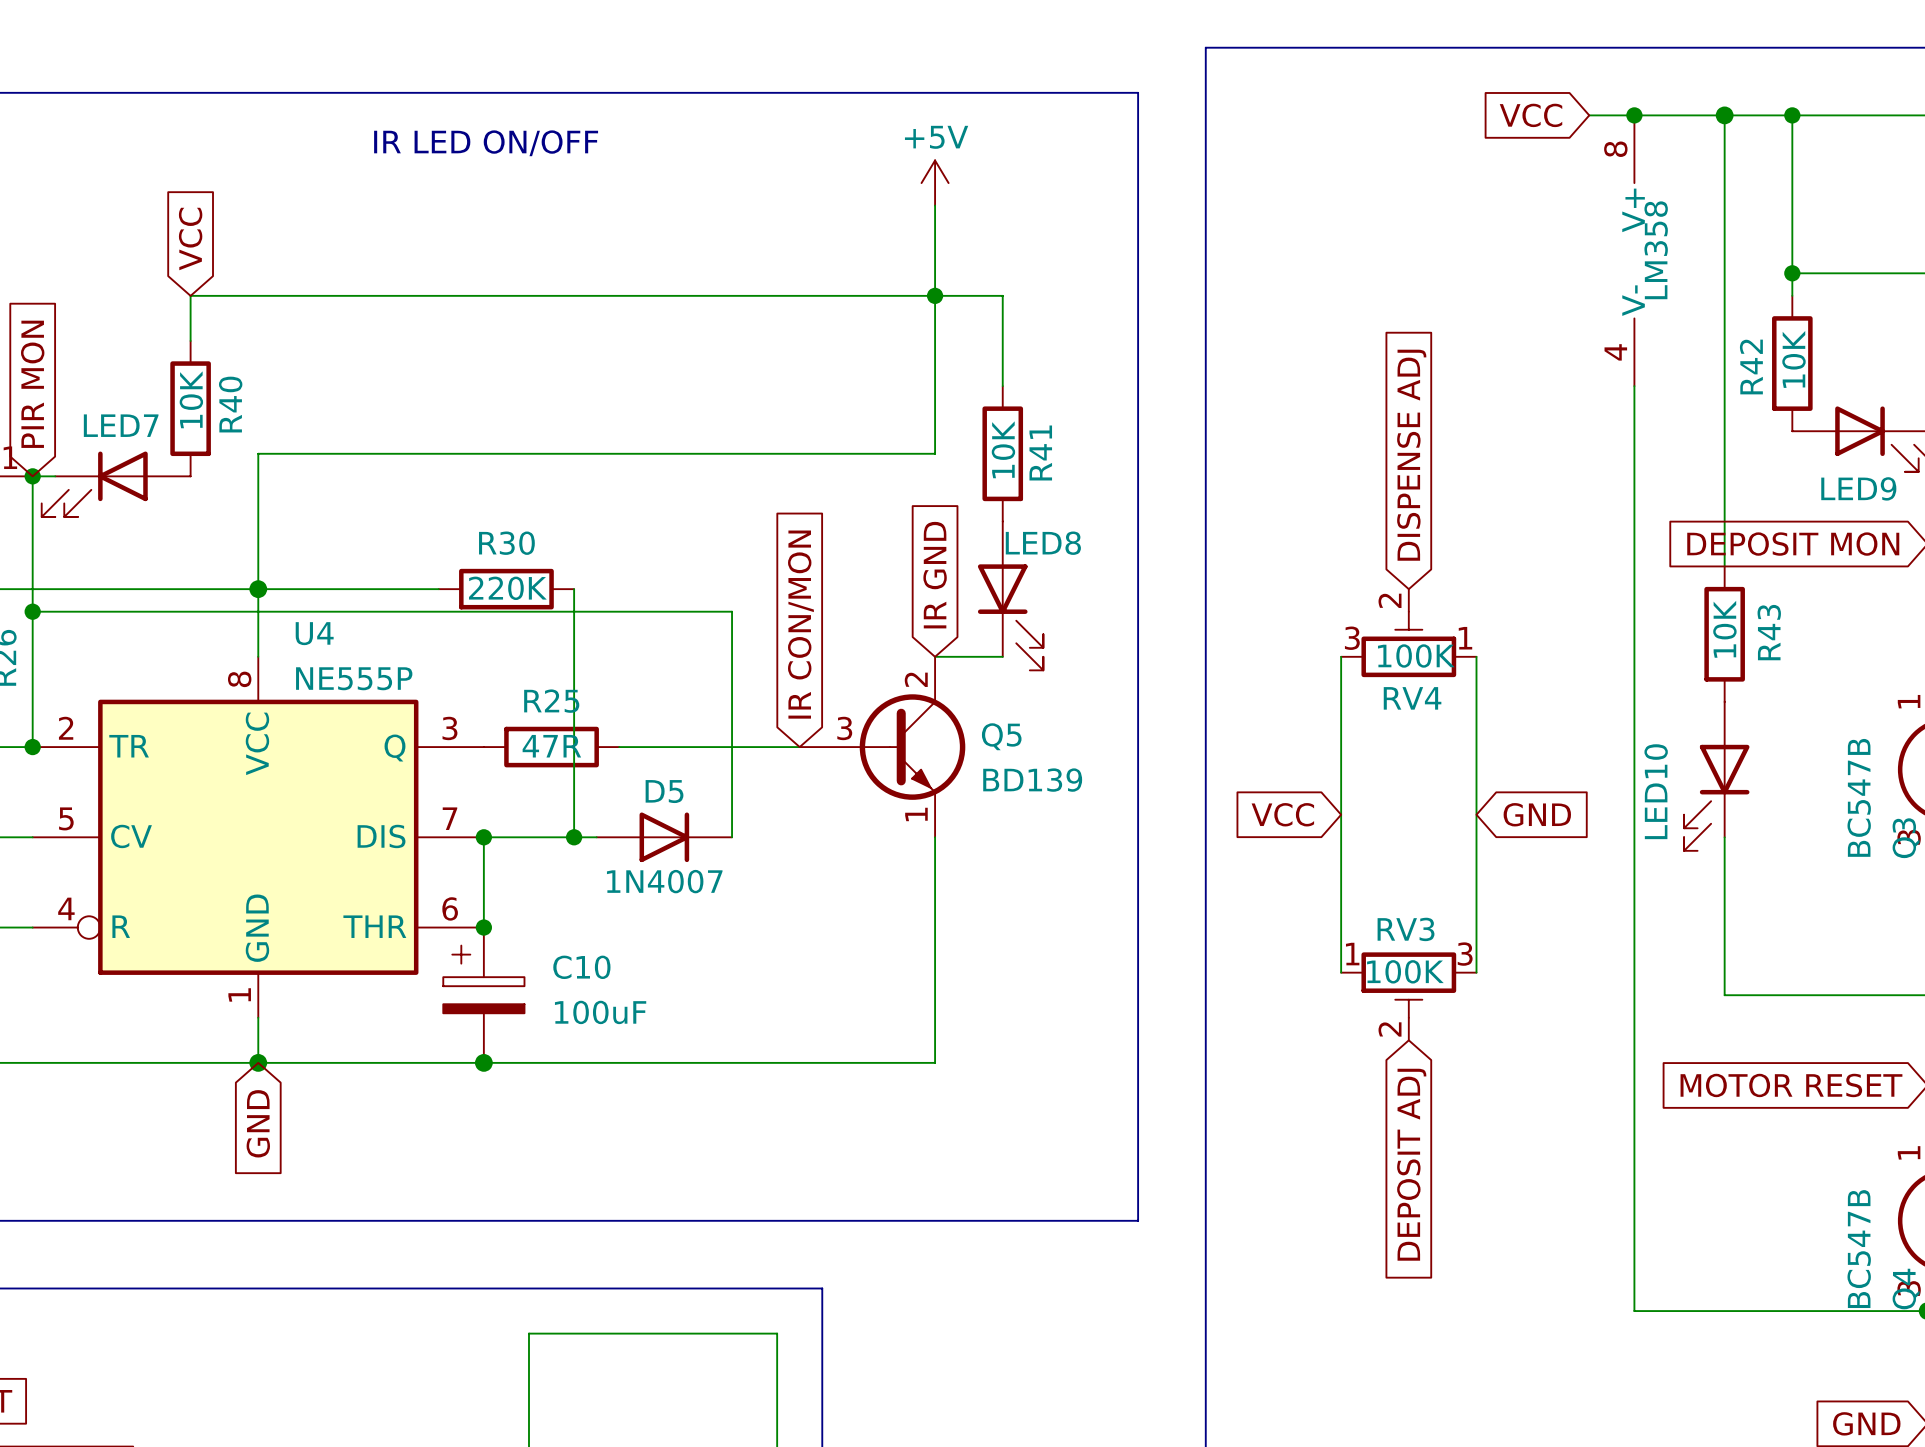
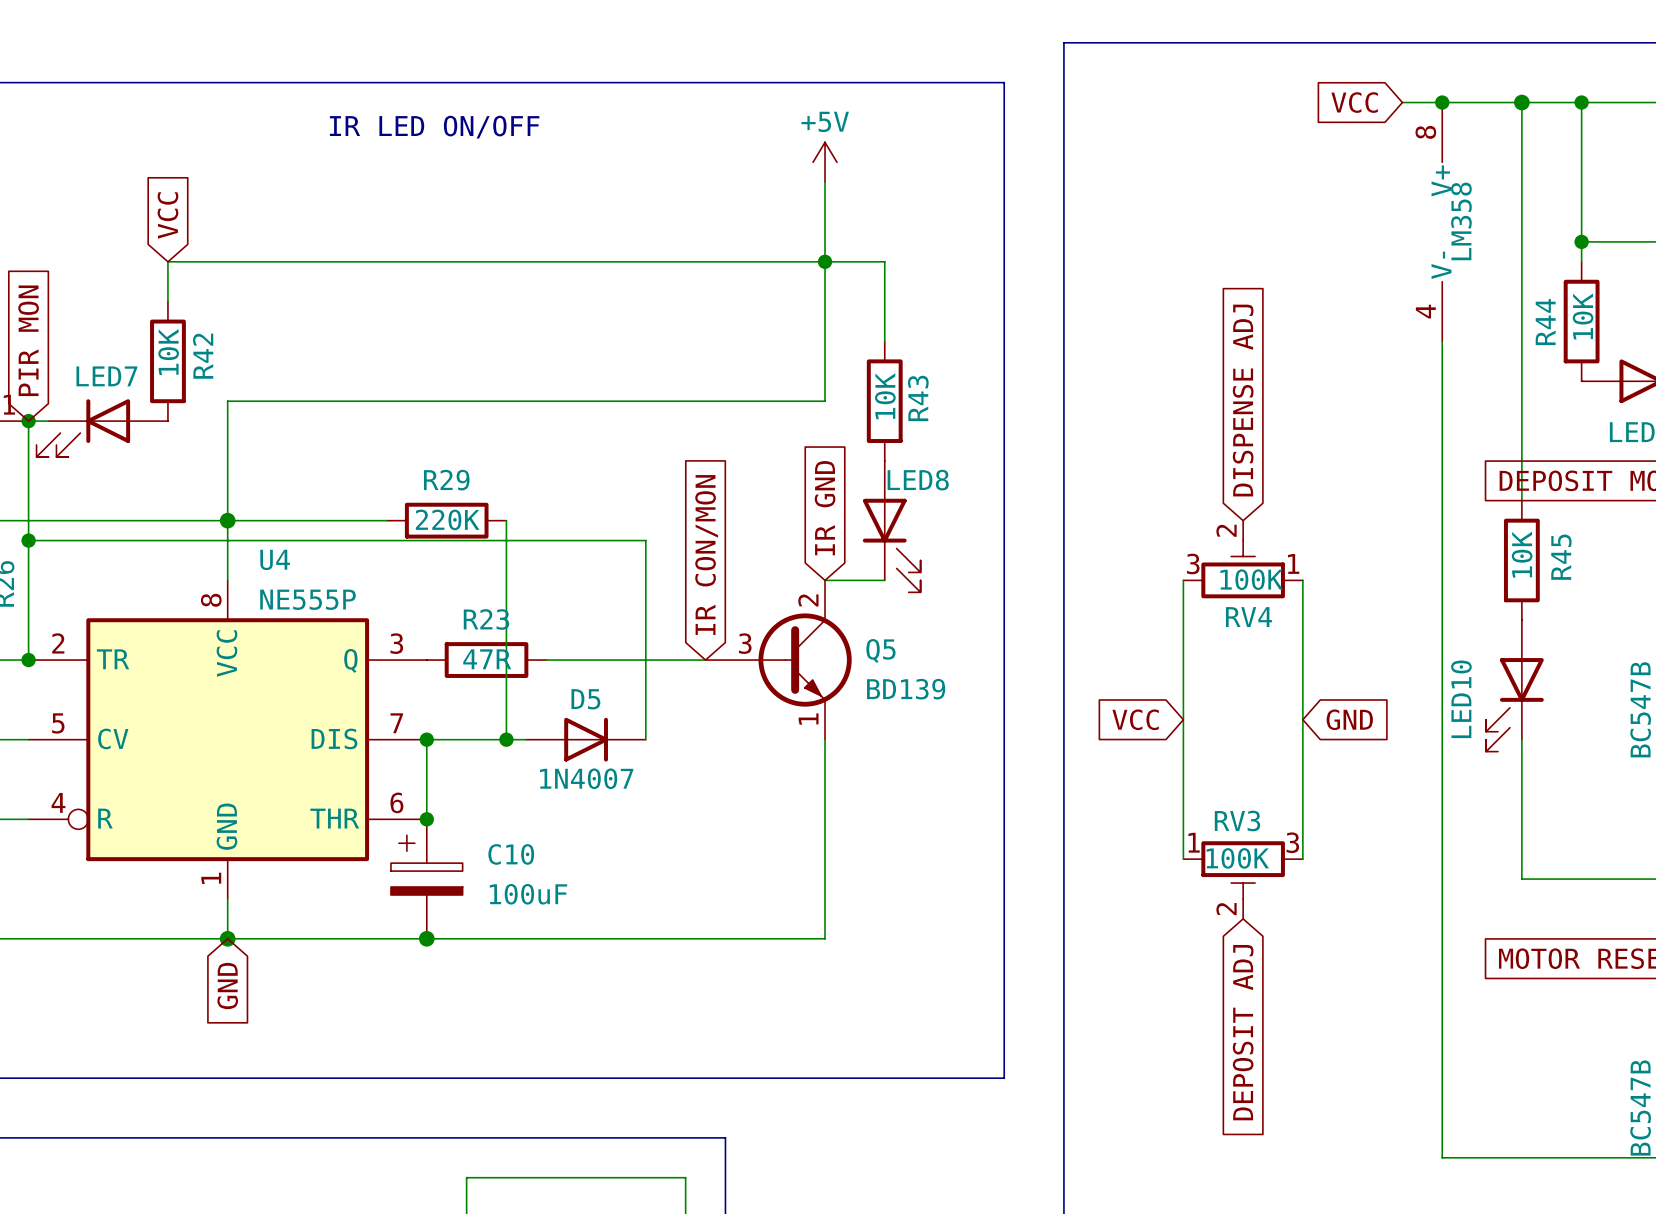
R42 name: R42 (1751, 366) -> R44 (1545, 322)
R40 name: R40 (230, 404) -> R42 (203, 356)
R41 name: R41 (1040, 452) -> R43 (918, 398)
R30 name: R30 (506, 543) -> R29 (446, 480)
R43 name: R43 (1769, 632) -> R45 (1561, 557)
R25 name: R25 (551, 701) -> R23 (486, 619)

